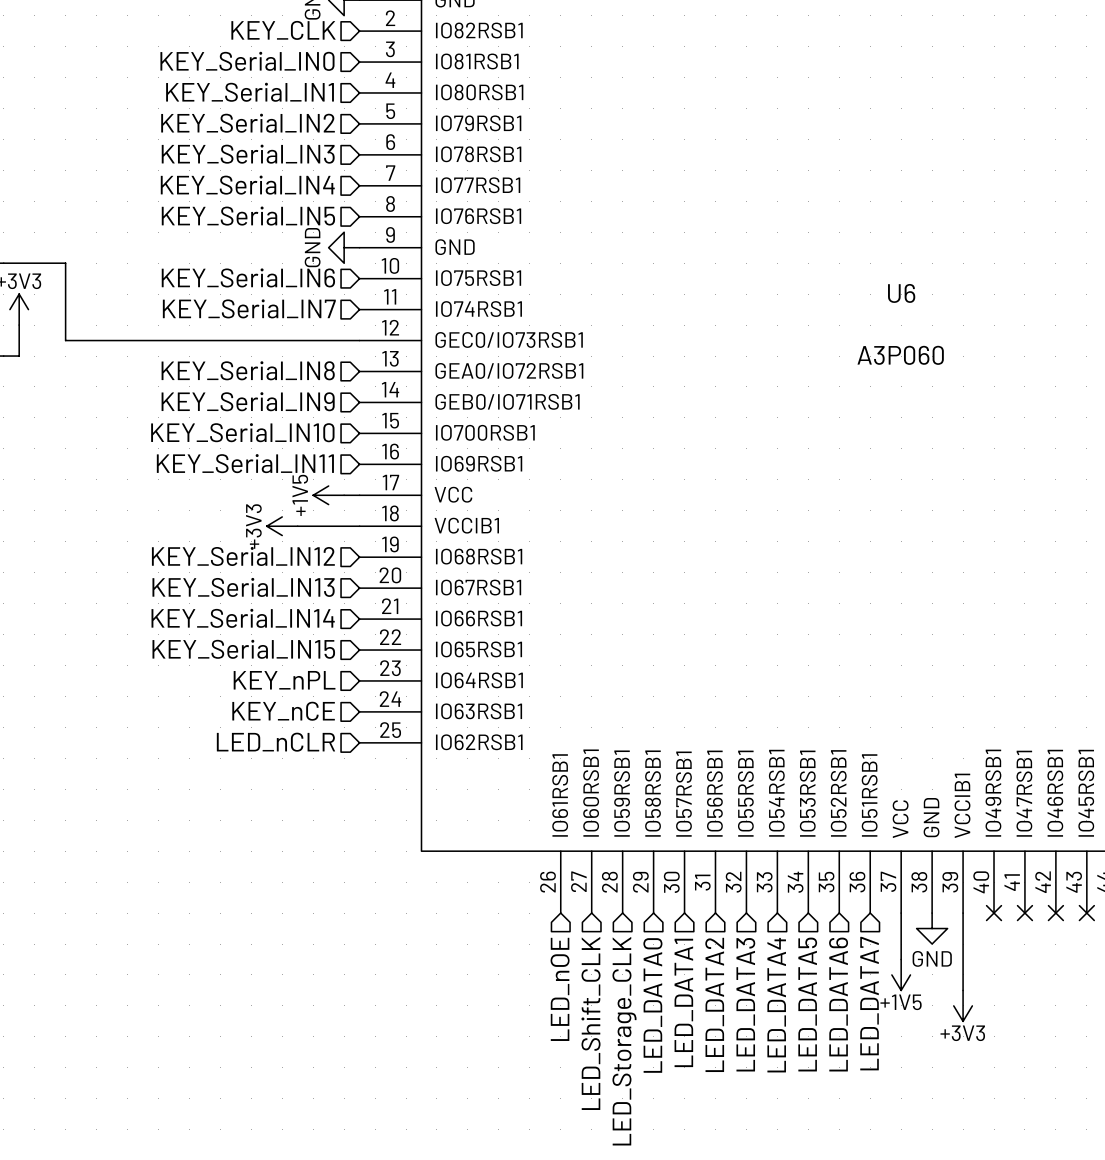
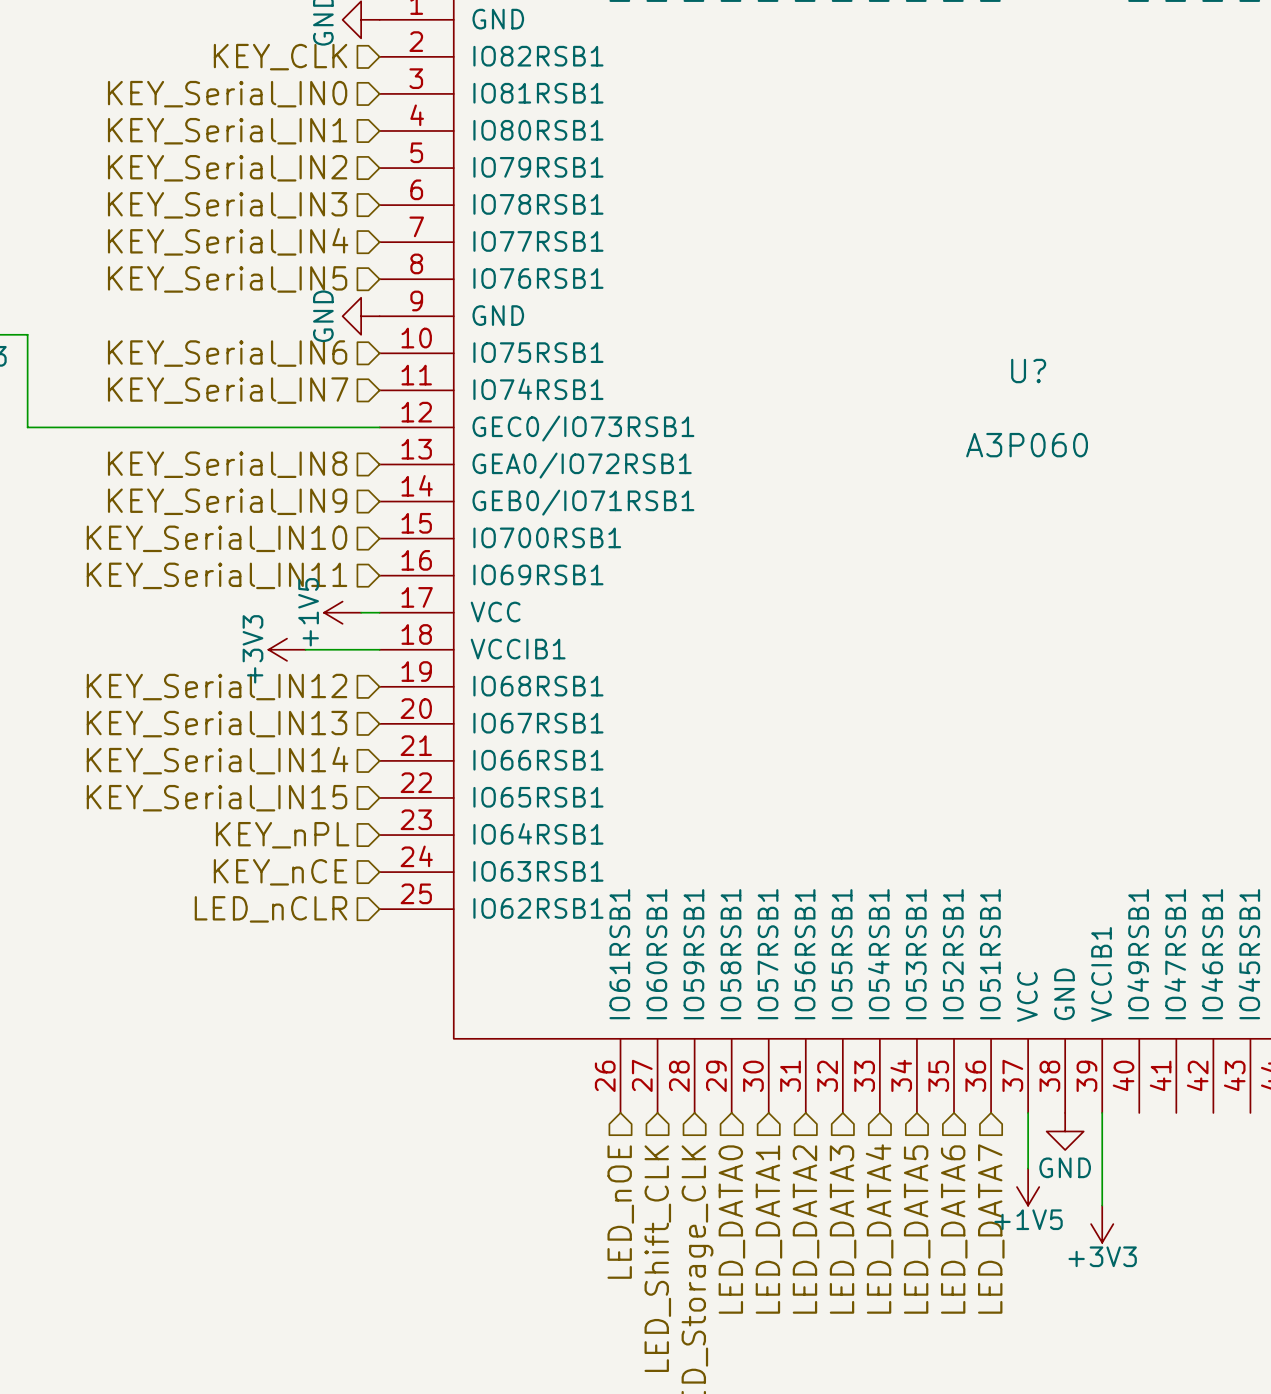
U6 name: U6 (901, 293) -> U? (1028, 371)
no-connect mark: (994, 913) -> none
no-connect mark: (1024, 913) -> none
no-connect mark: (1055, 913) -> none
no-connect mark: (1086, 913) -> none

